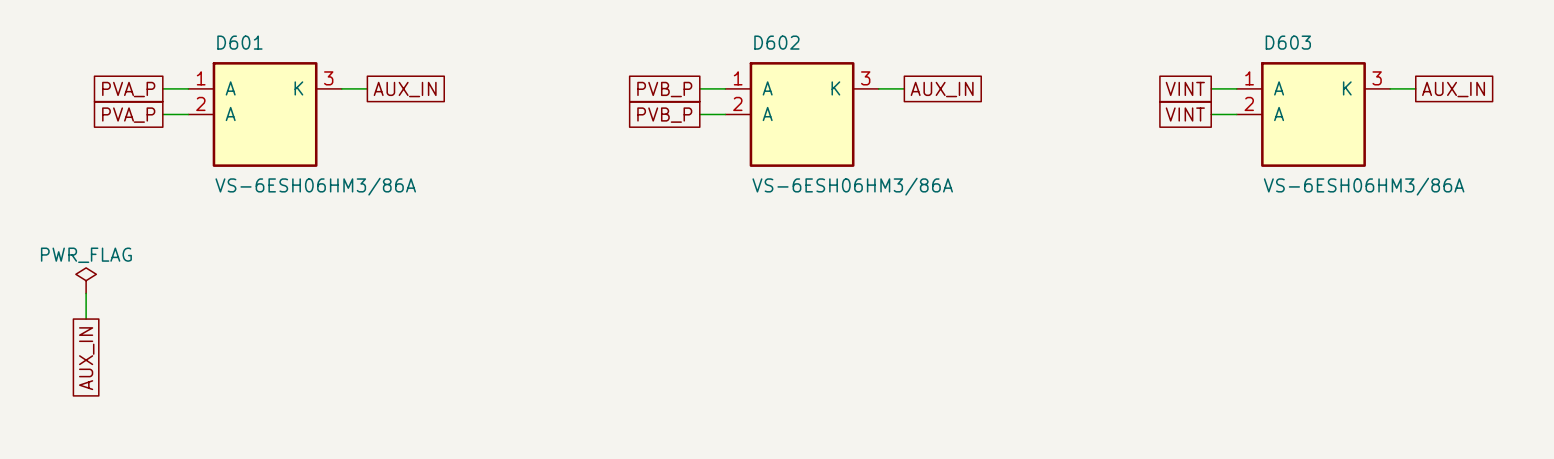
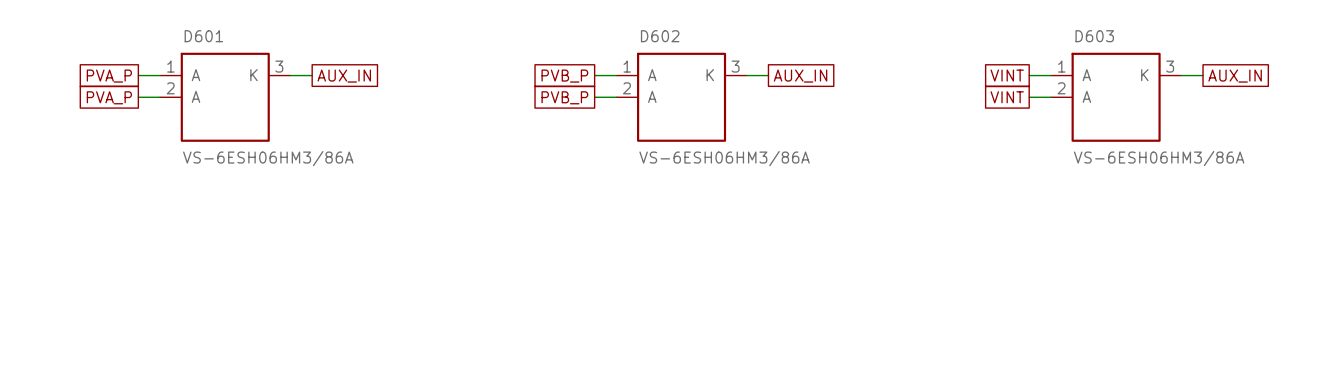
power symbol: PWR_FLAG (86, 280) -> none
wire: (86, 293) (86, 319) -> none
global label: AUX_IN (86, 358) -> none

